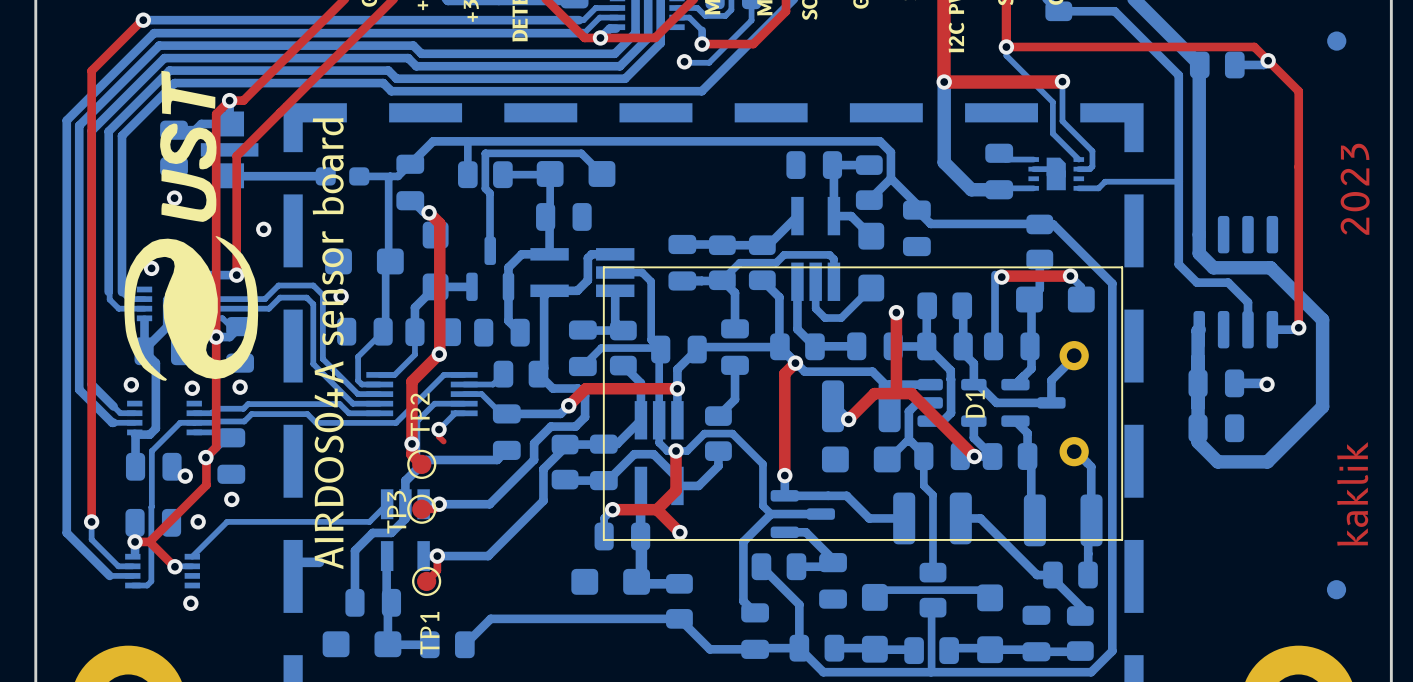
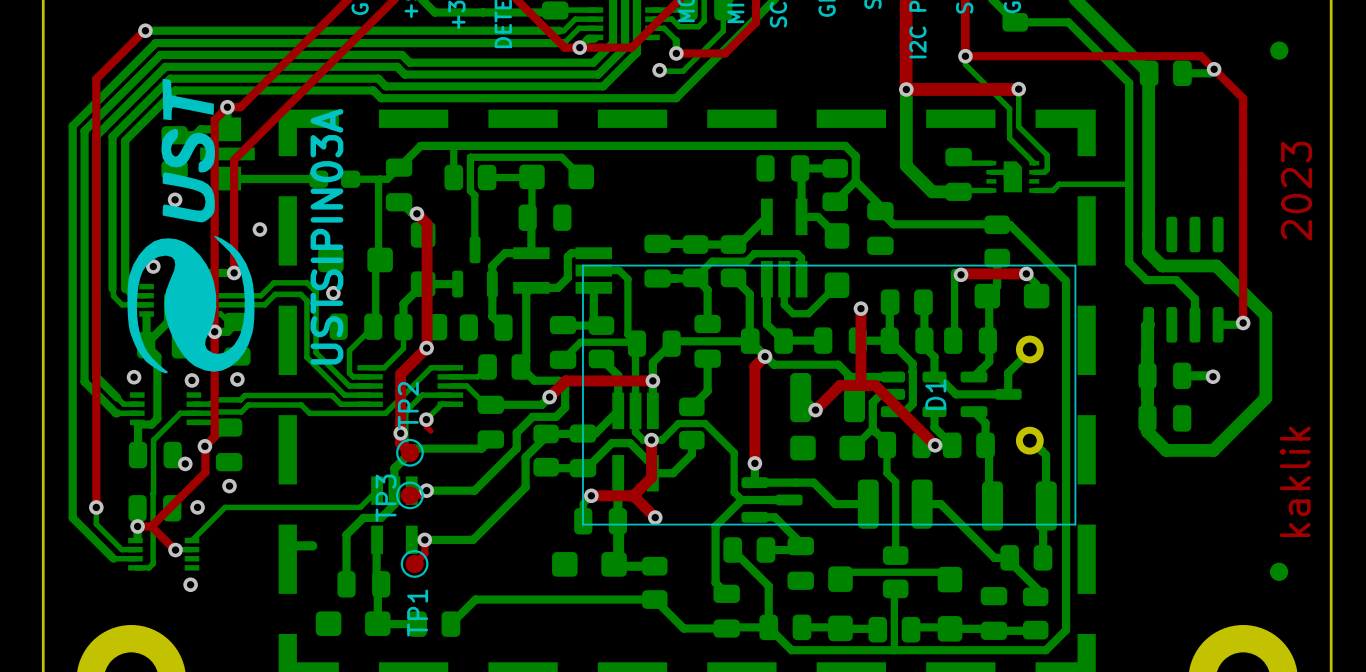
text: none -> USTSIPIN03A (326, 236)
text: AIRDOS04A sensor board (328, 343) -> none

